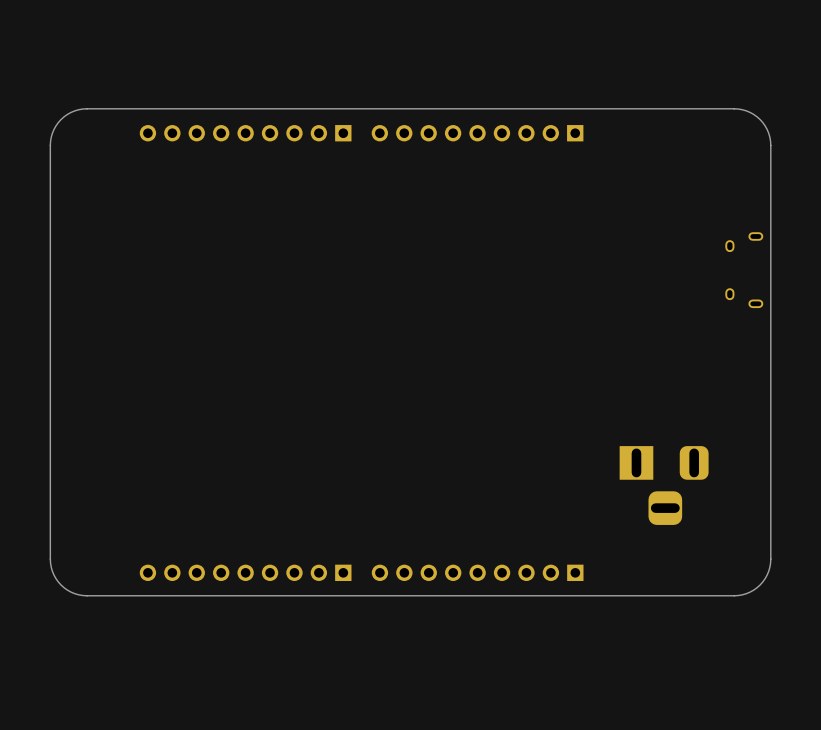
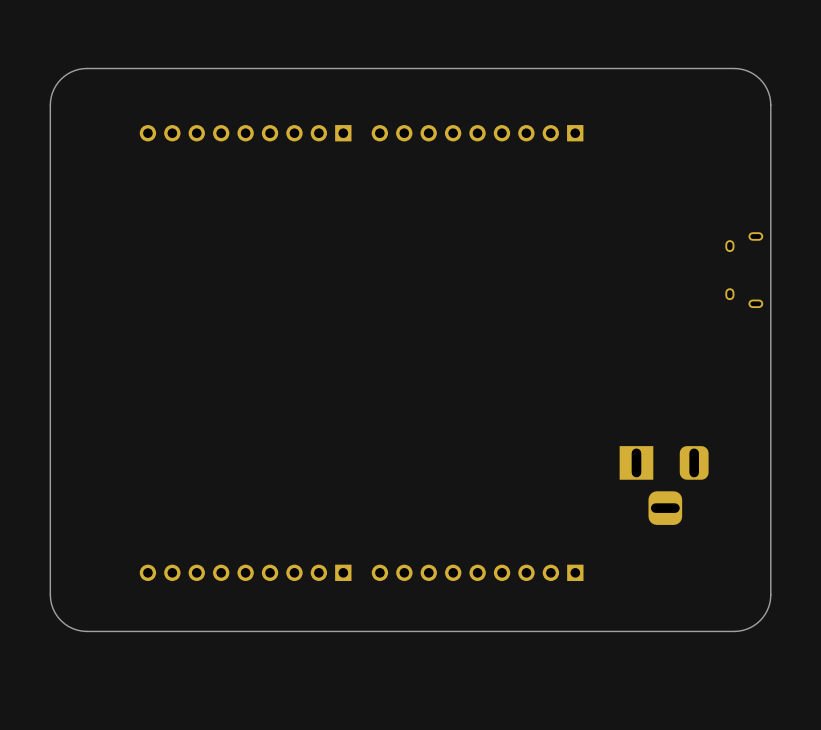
board edge: (770, 145) (767, 129) (760, 119) (746, 110) (734, 108) (86, 108) (74, 110) (61, 119) (52, 133) (50, 145) -> (770, 145) (770, 101) (767, 89) (753, 74) (734, 68) (82, 68) (64, 76) (53, 89) (50, 101) (50, 145)
board edge: (770, 559) (768, 571) (760, 585) (746, 593) (734, 595) (86, 595) (71, 592) (61, 585) (53, 575) (50, 559) -> (770, 559) (770, 598) (767, 610) (753, 625) (734, 631) (82, 631) (64, 623) (53, 608) (50, 594) (50, 559)

